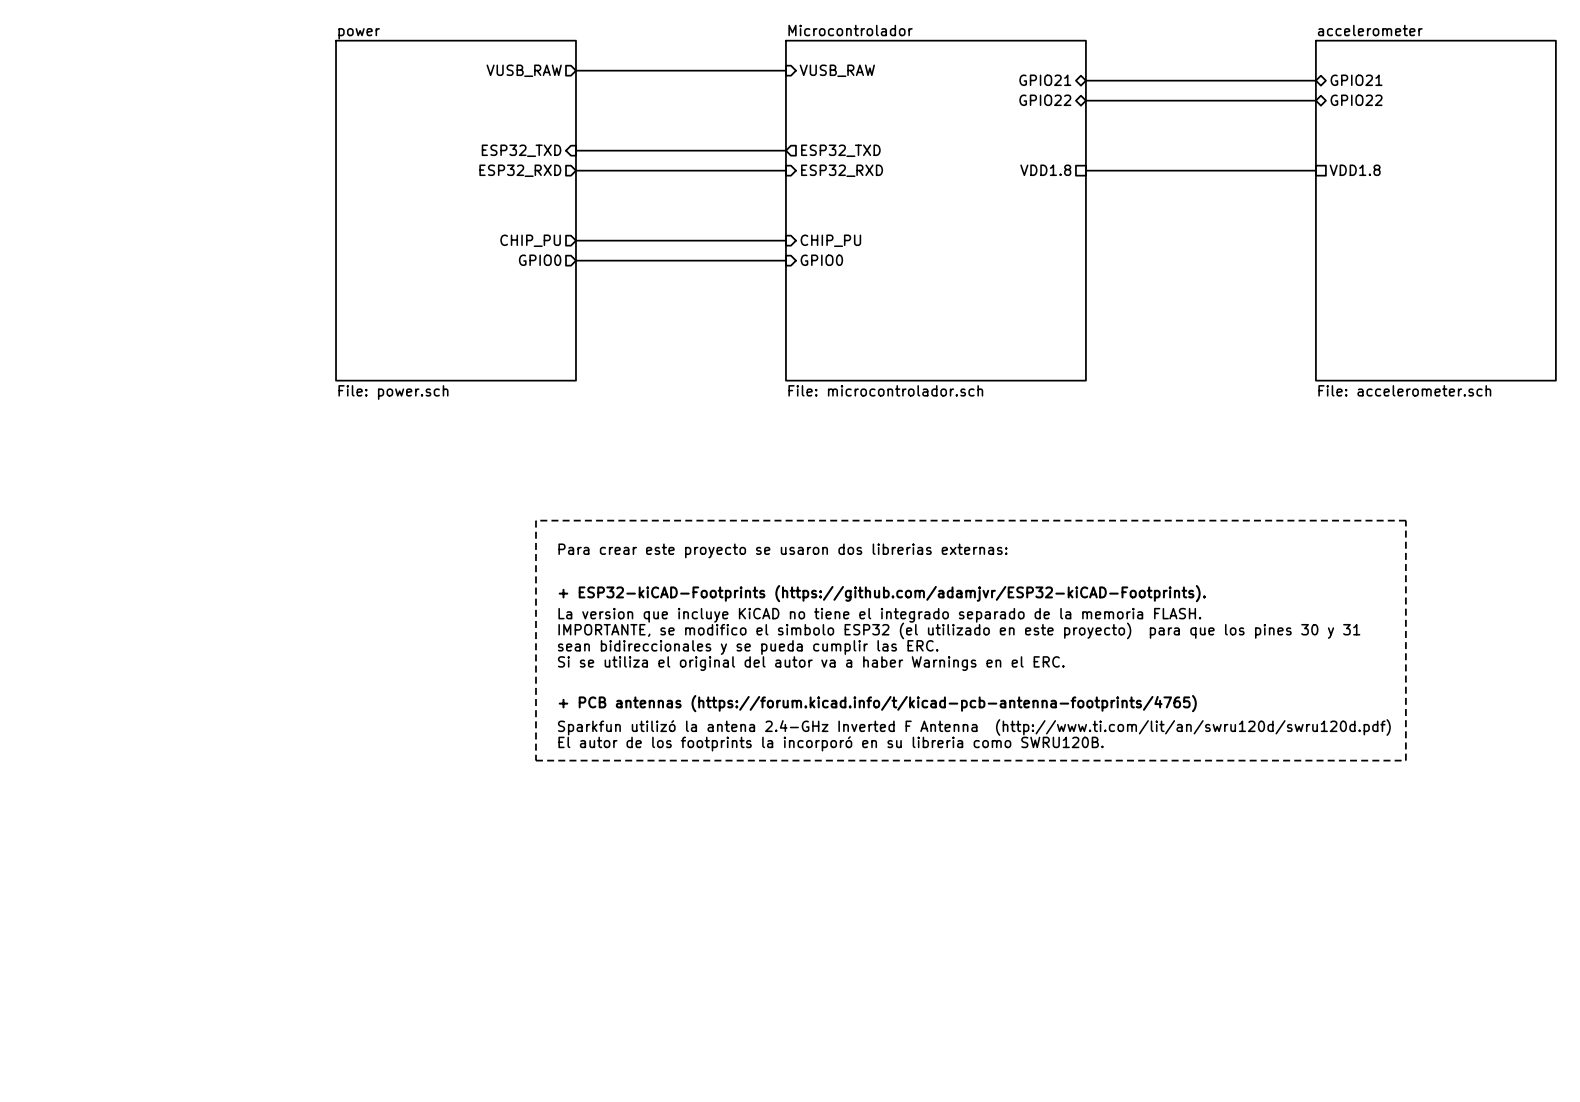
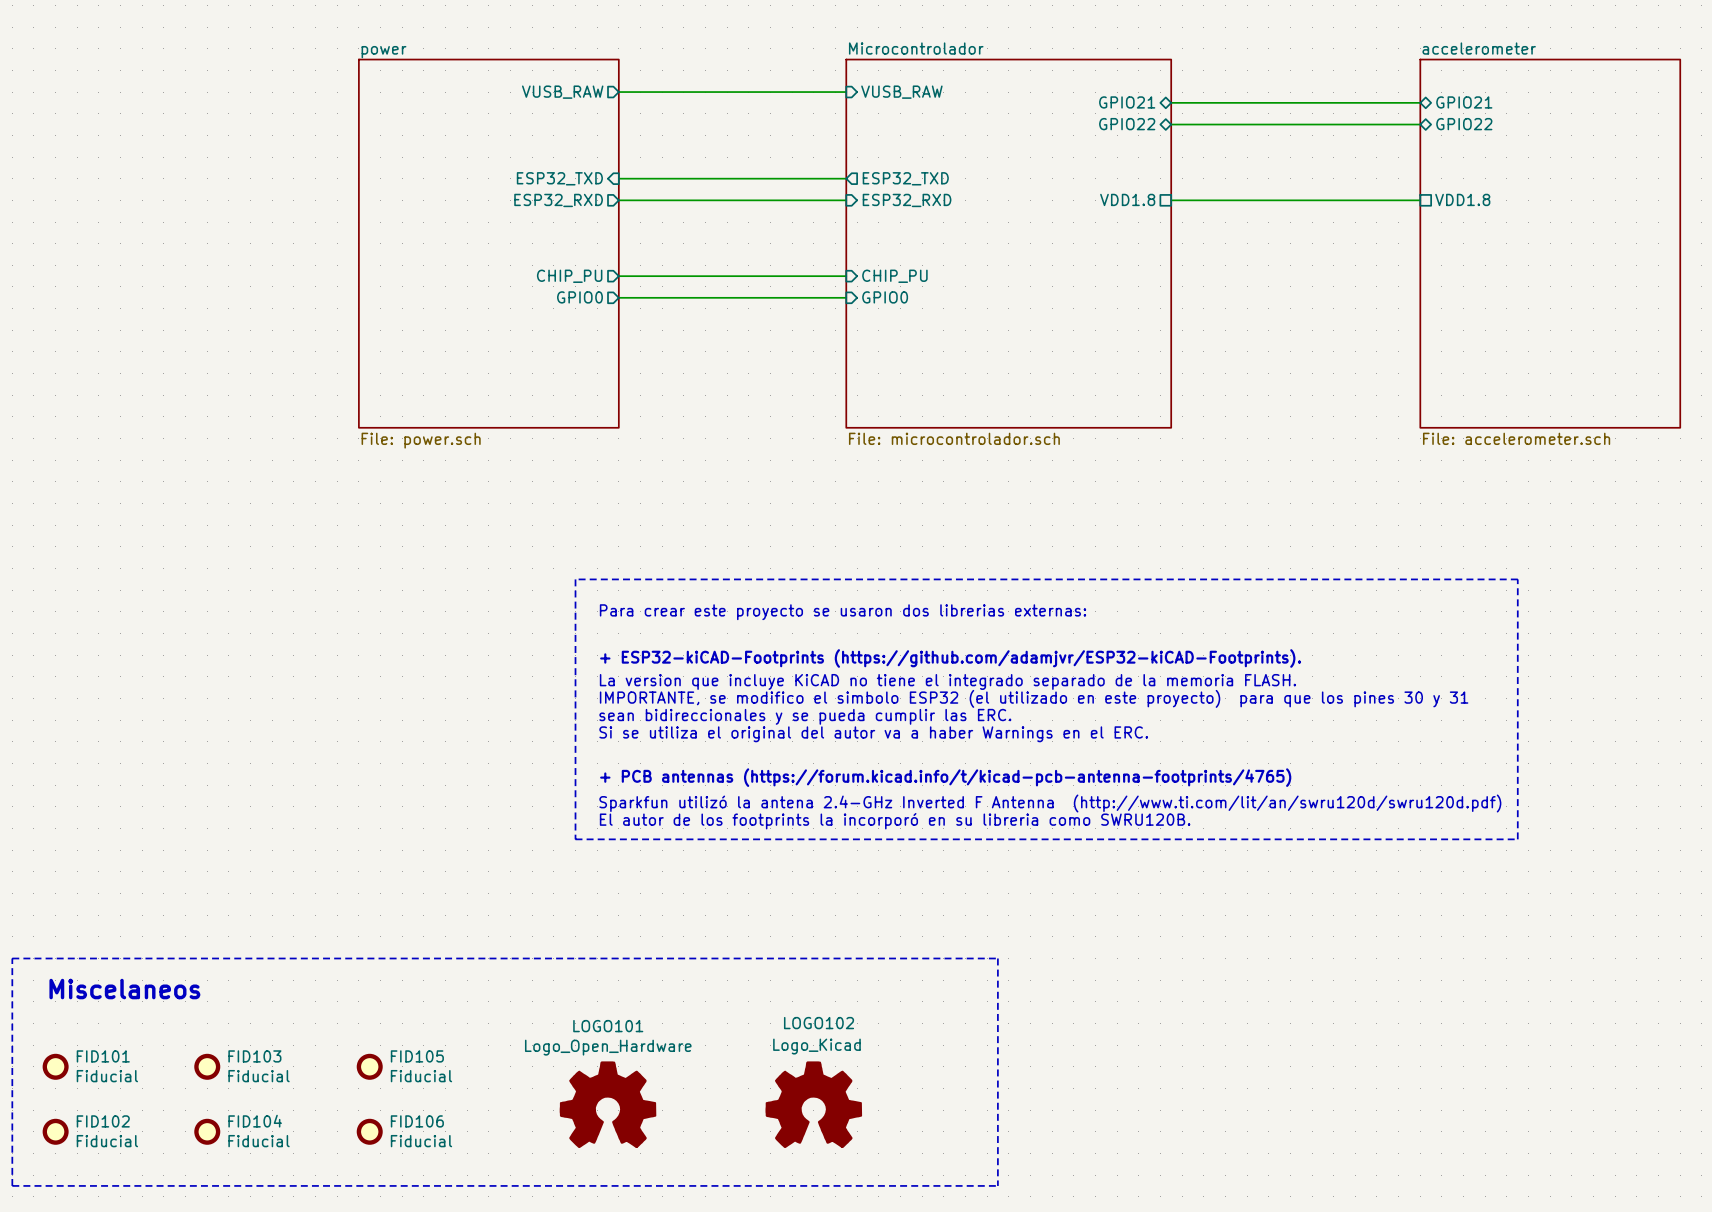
line: none -> (12, 958) (12, 1185) (997, 1185) (997, 958) (12, 958)
text: none -> Miscelaneos (124, 989)
FID101: none -> Fiducial (55, 1066)
FID103: none -> Fiducial (207, 1066)
FID105: none -> Fiducial (369, 1066)
LOGO101: none -> Logo_Open_Hardware (608, 1104)
LOGO102: none -> Logo_Kicad (813, 1104)
FID102: none -> Fiducial (55, 1131)
FID104: none -> Fiducial (207, 1131)
FID106: none -> Fiducial (369, 1131)

